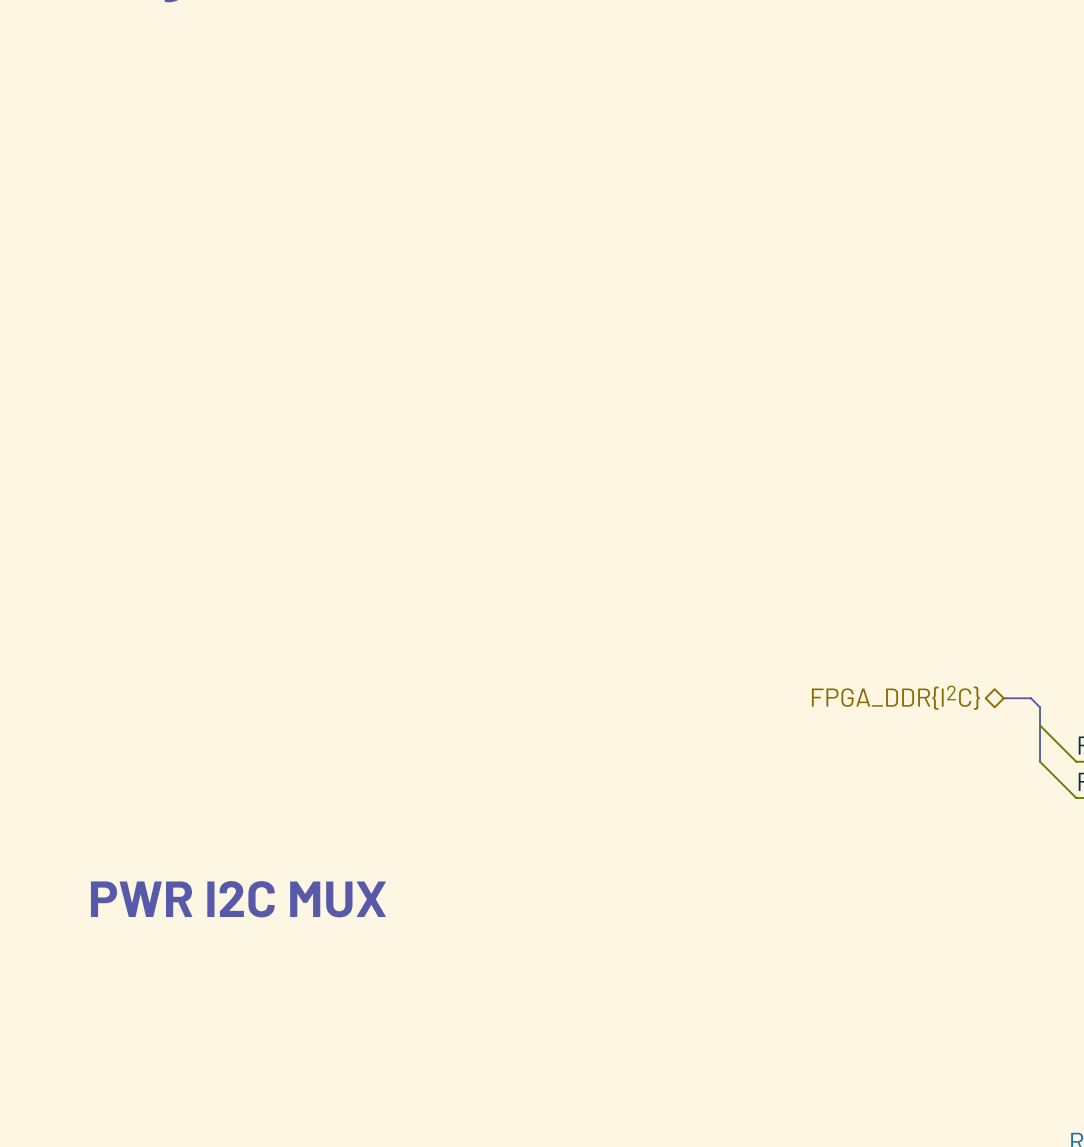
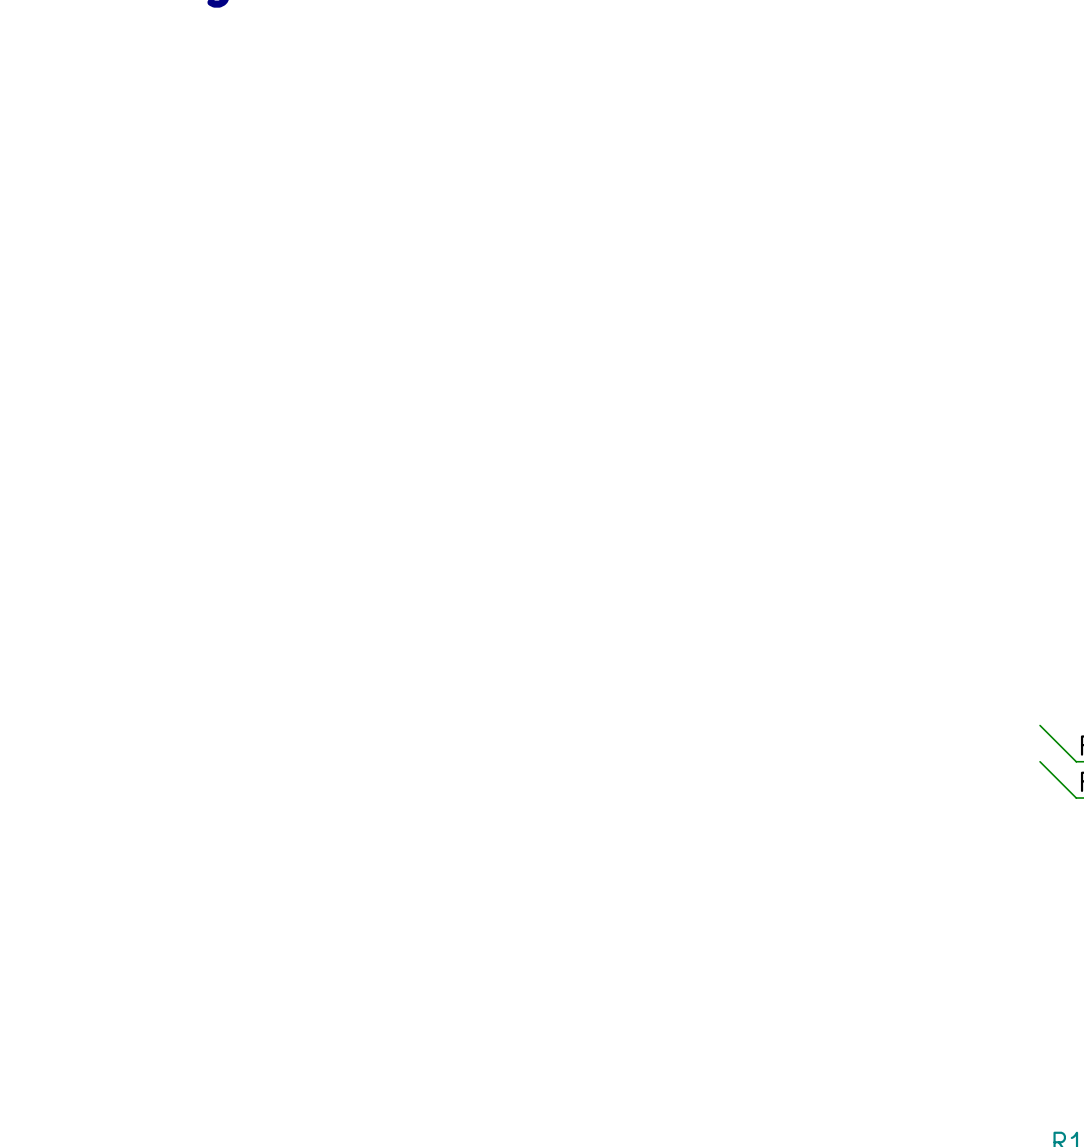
hierarchical label: FPGA_DDR{I2C} (895, 697) -> none
bus: (1003, 698) (1030, 698) (1040, 707) (1040, 761) -> none
text: PWR I2C MUX (238, 899) -> none

